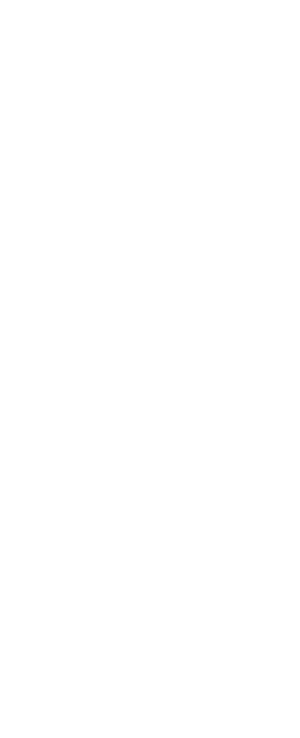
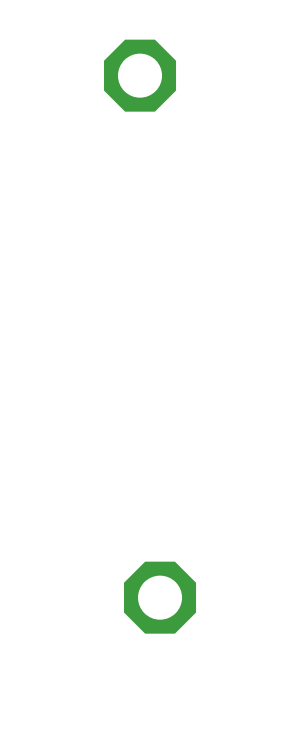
part: none -> (140, 75)
part: none -> (160, 597)

